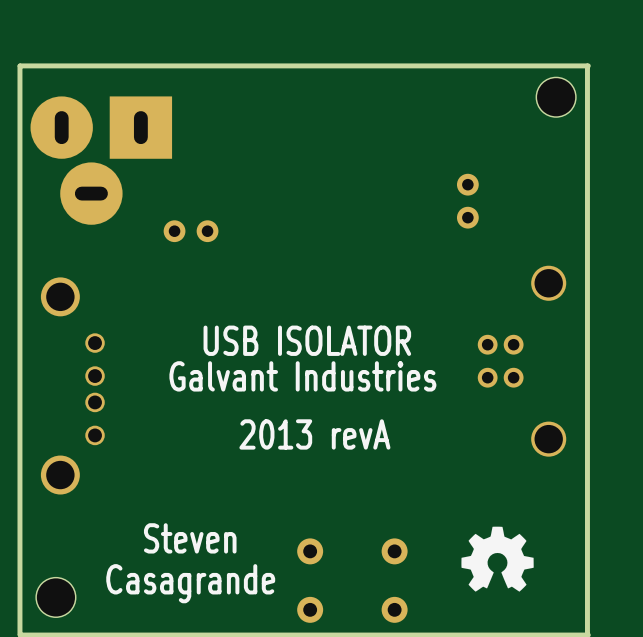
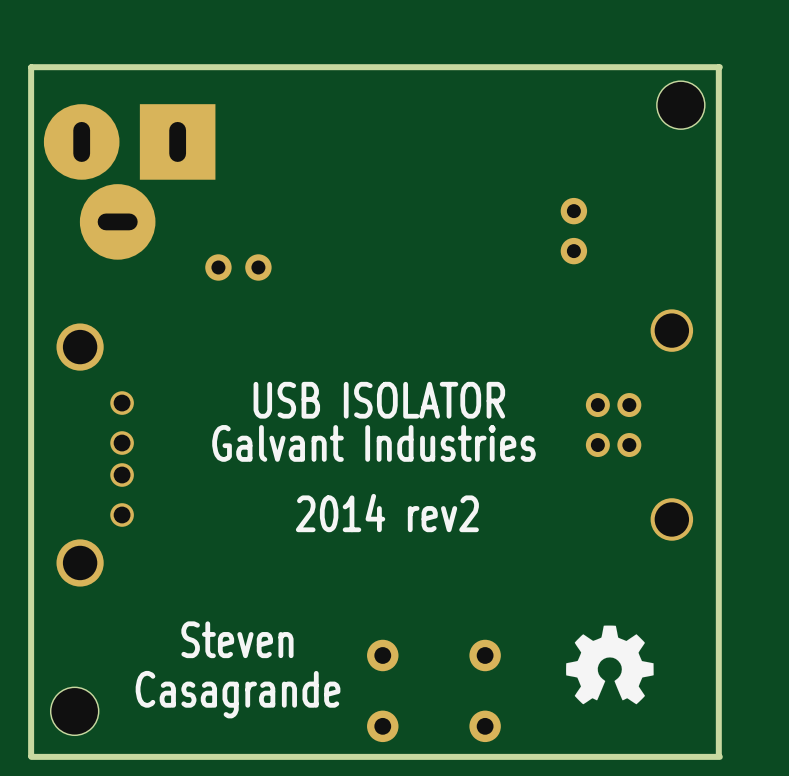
text: 2013 revA (314, 434) -> 2014 rev2 (387, 513)

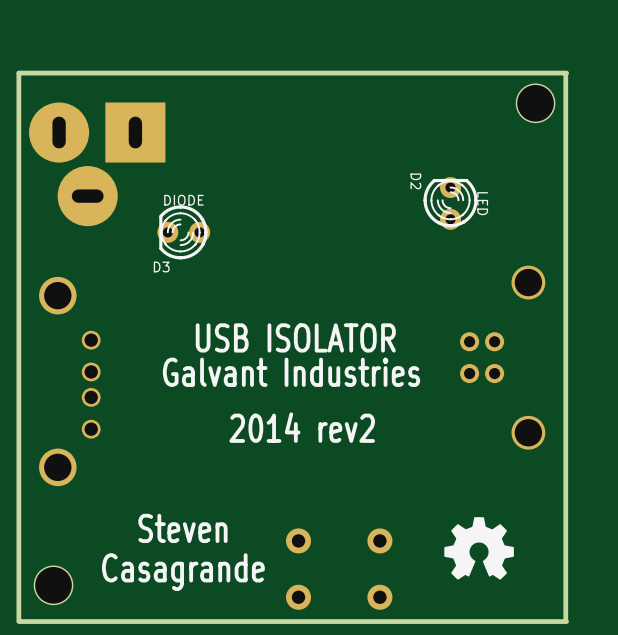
part: (573, 231) -> none
D2: none -> LED (450, 203)
part: (238, 267) -> none
D3: none -> DIODE (183, 232)

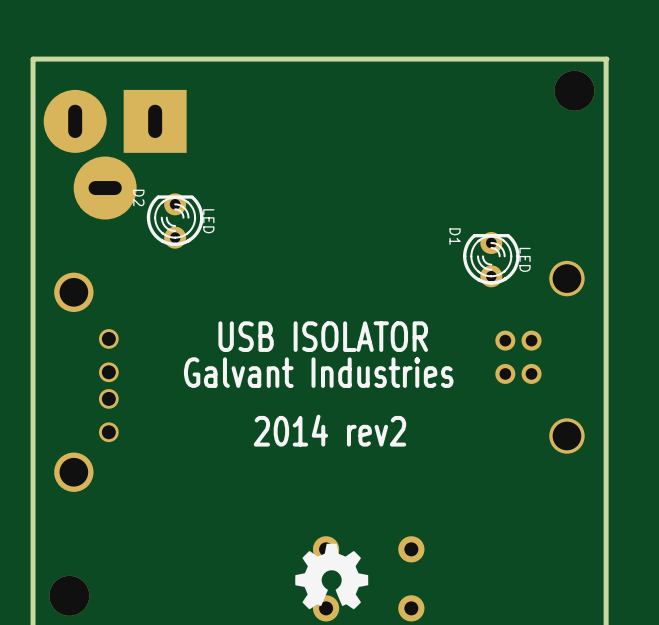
part footprint: [516, 84, 555, 123] -> [554, 70, 595, 111]
D2 position: (450, 203) -> (175, 221)
D3: DIODE (183, 232) -> none
D1: none -> LED (491, 259)
text: Steven (182, 528) -> none
drawing position: (479, 548) -> (331, 576)
part footprint: [34, 566, 73, 605] -> [49, 575, 90, 616]
text: Casagrande (183, 572) -> none

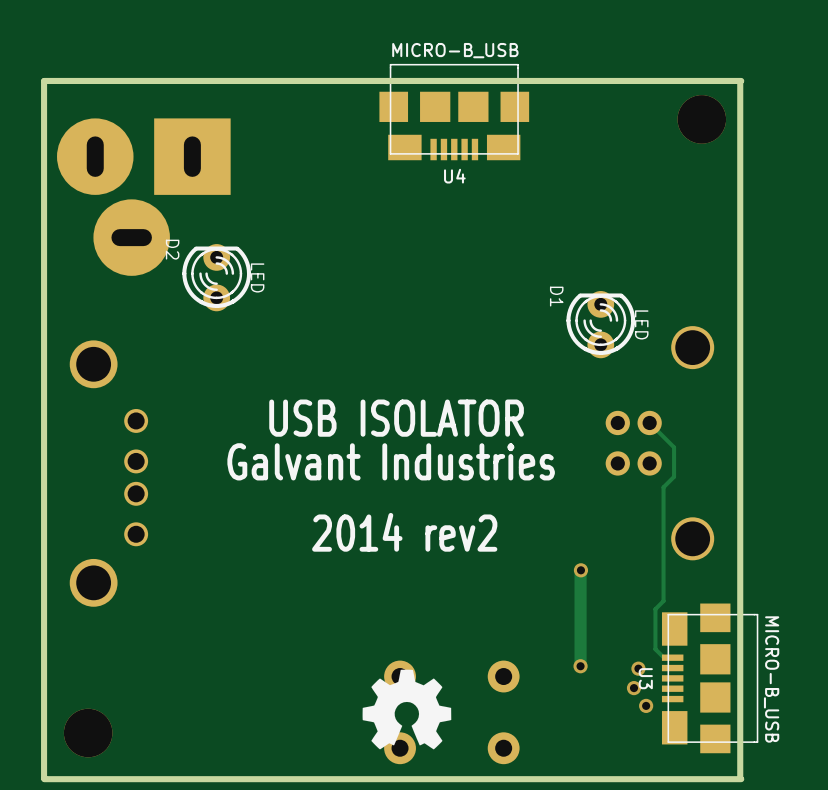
U4: none -> MICRO-B_USB (454, 112)
track: none -> (649, 422) (674, 447) (674, 476) (663, 487) (663, 601) (655, 609) (655, 649) (663, 657) (672, 657)
track: none -> (580, 570) (580, 666)
via: none -> (580, 570)
via: none -> (580, 666)
via: none -> (638, 668)
U3: none -> MICRO-B_USB (710, 678)
via: none -> (633, 688)
via: none -> (646, 705)

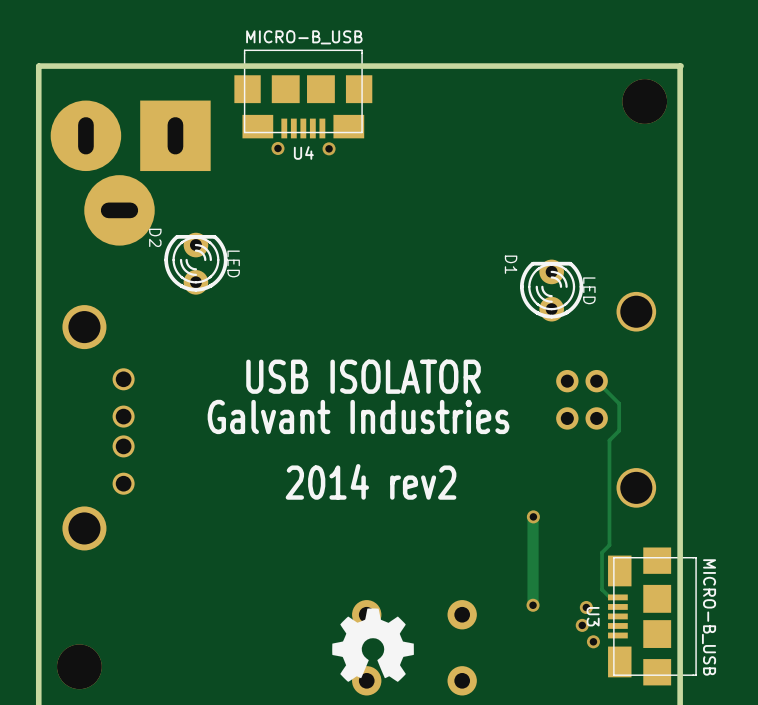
U4 position: (454, 112) -> (303, 93)
via: none -> (277, 148)
via: none -> (329, 148)
D2 position: (216, 277) -> (195, 263)

